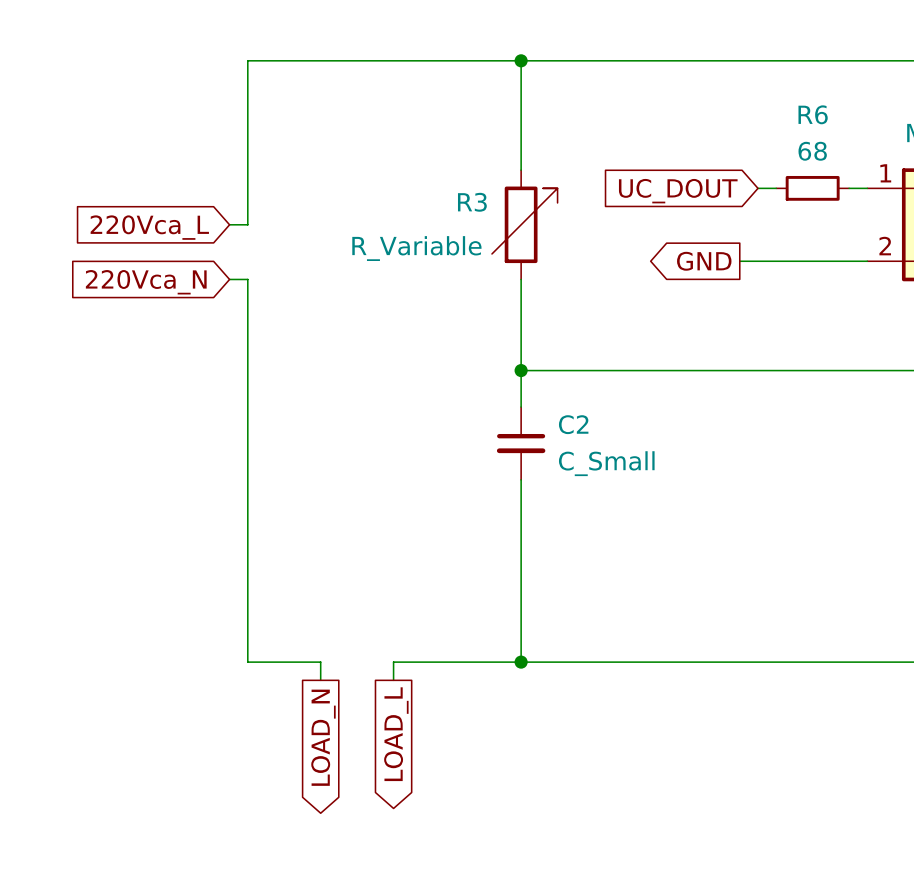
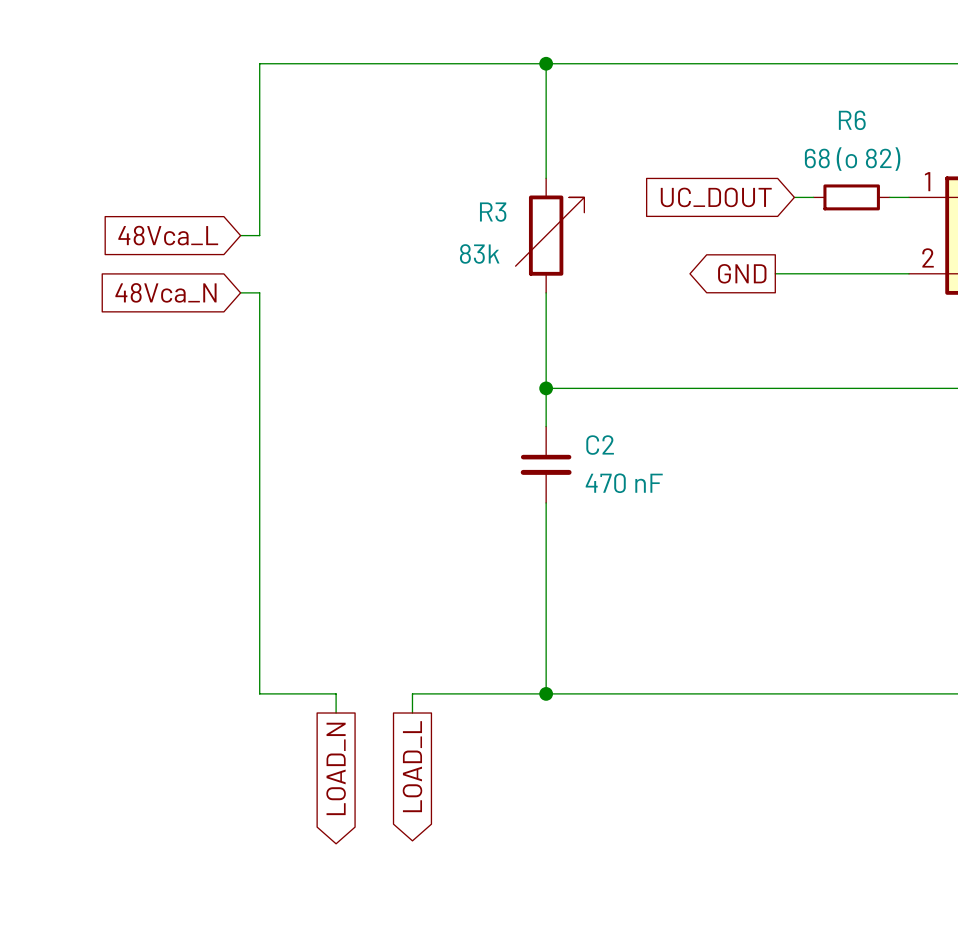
R6 value: 68 (812, 151) -> 68 (o 82) (852, 159)
global label: 220Vca_L (149, 227) -> 48Vca_L (168, 235)
R3 value: R_Variable (416, 248) -> 83k (479, 253)
global label: 220Vca_N (146, 282) -> 48Vca_N (165, 292)
C2 value: C_Small (606, 463) -> 470 nF (624, 483)

